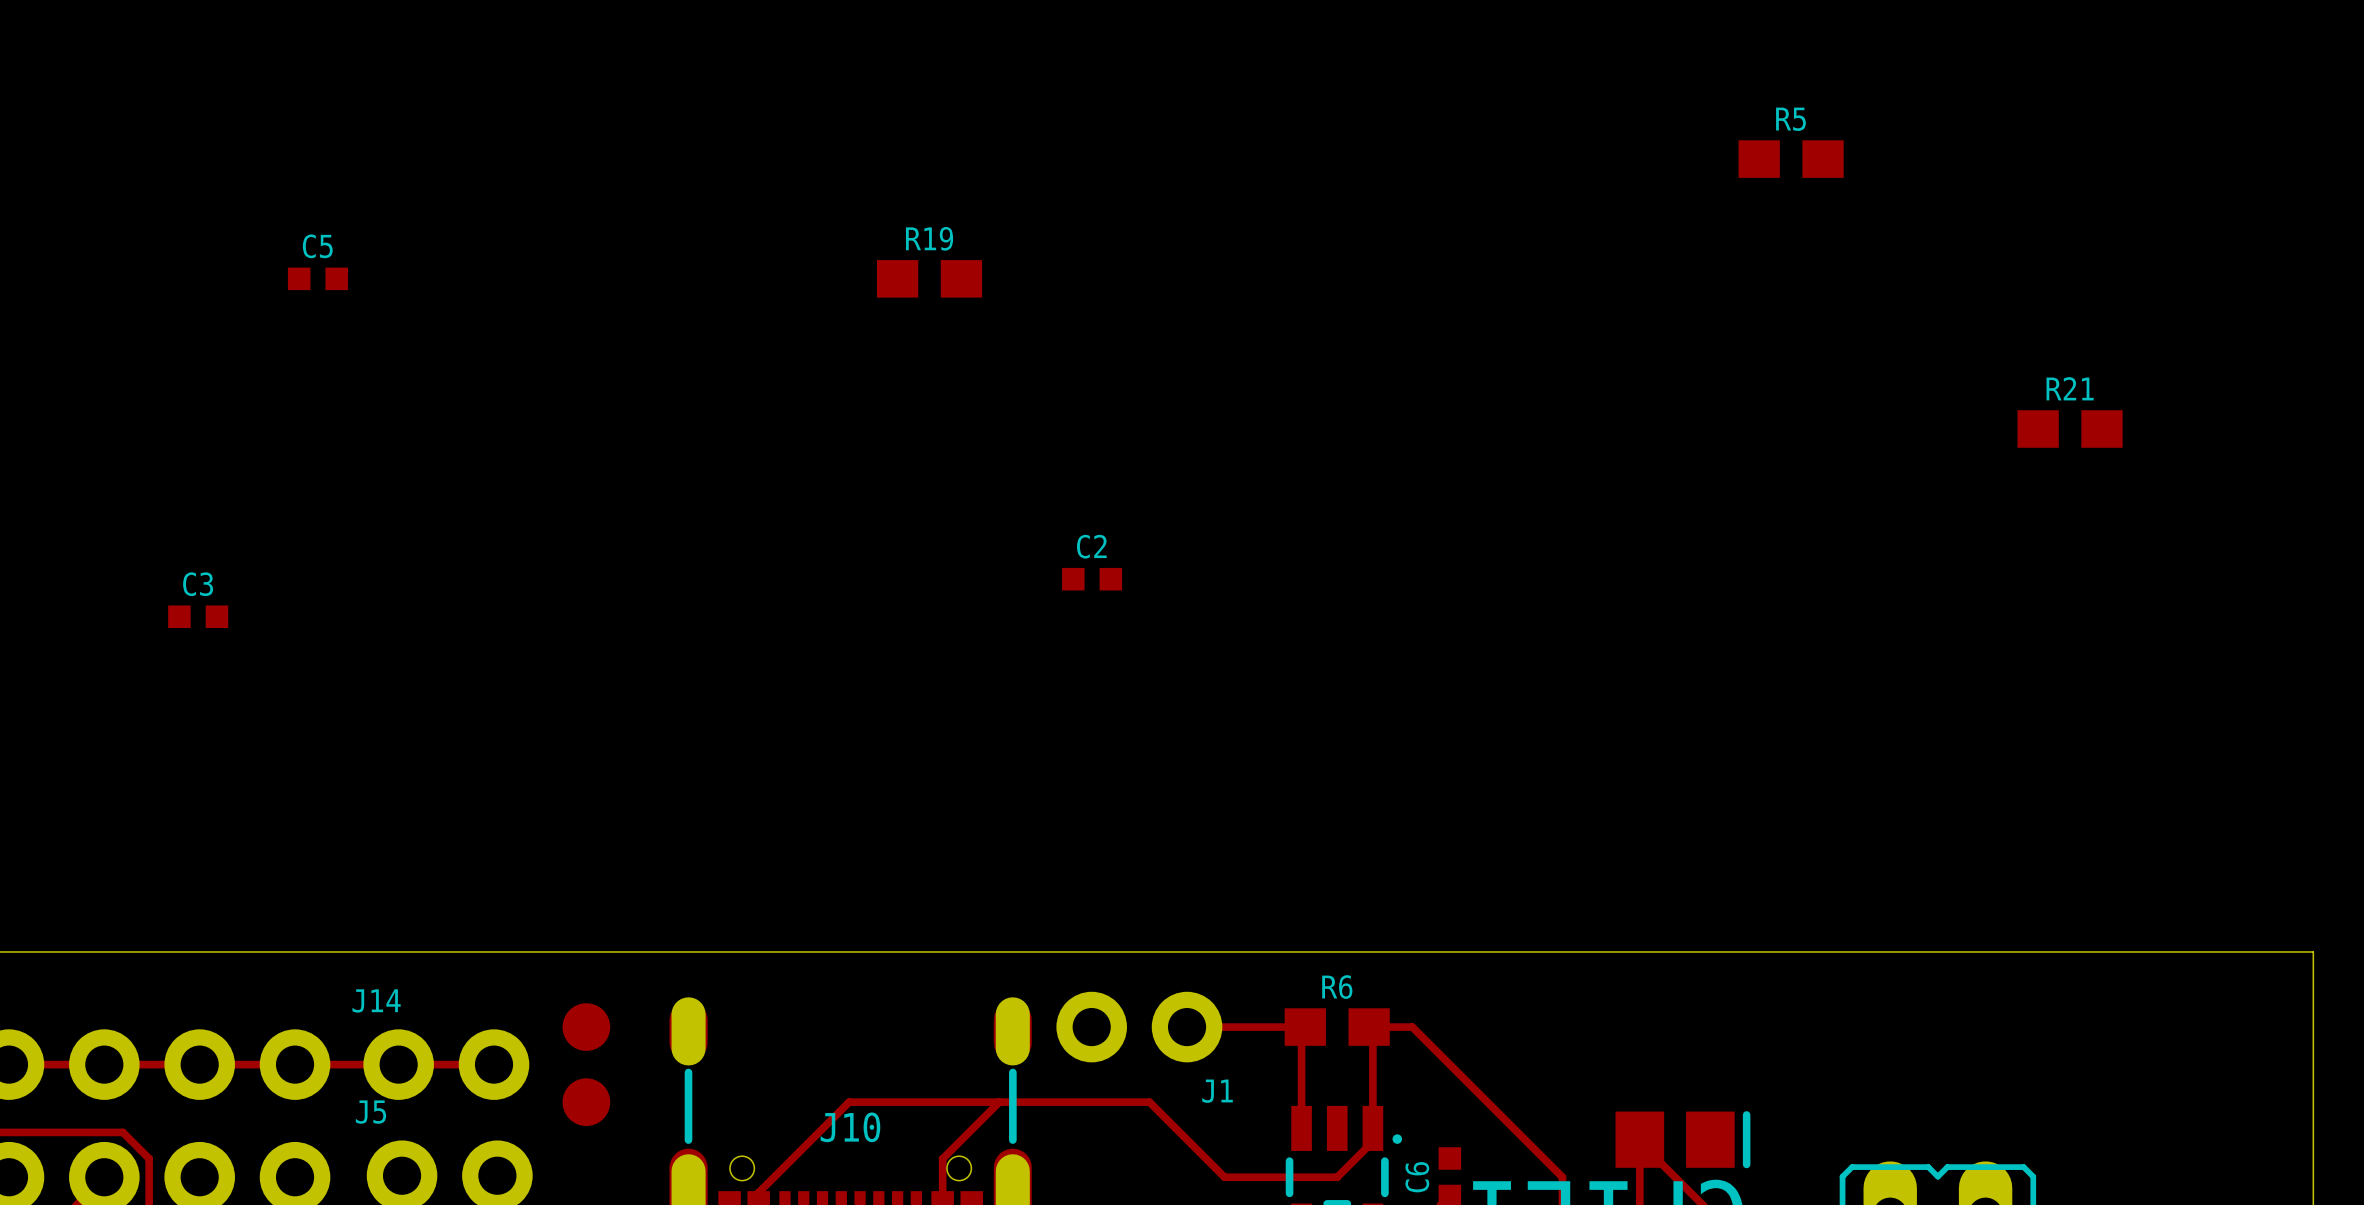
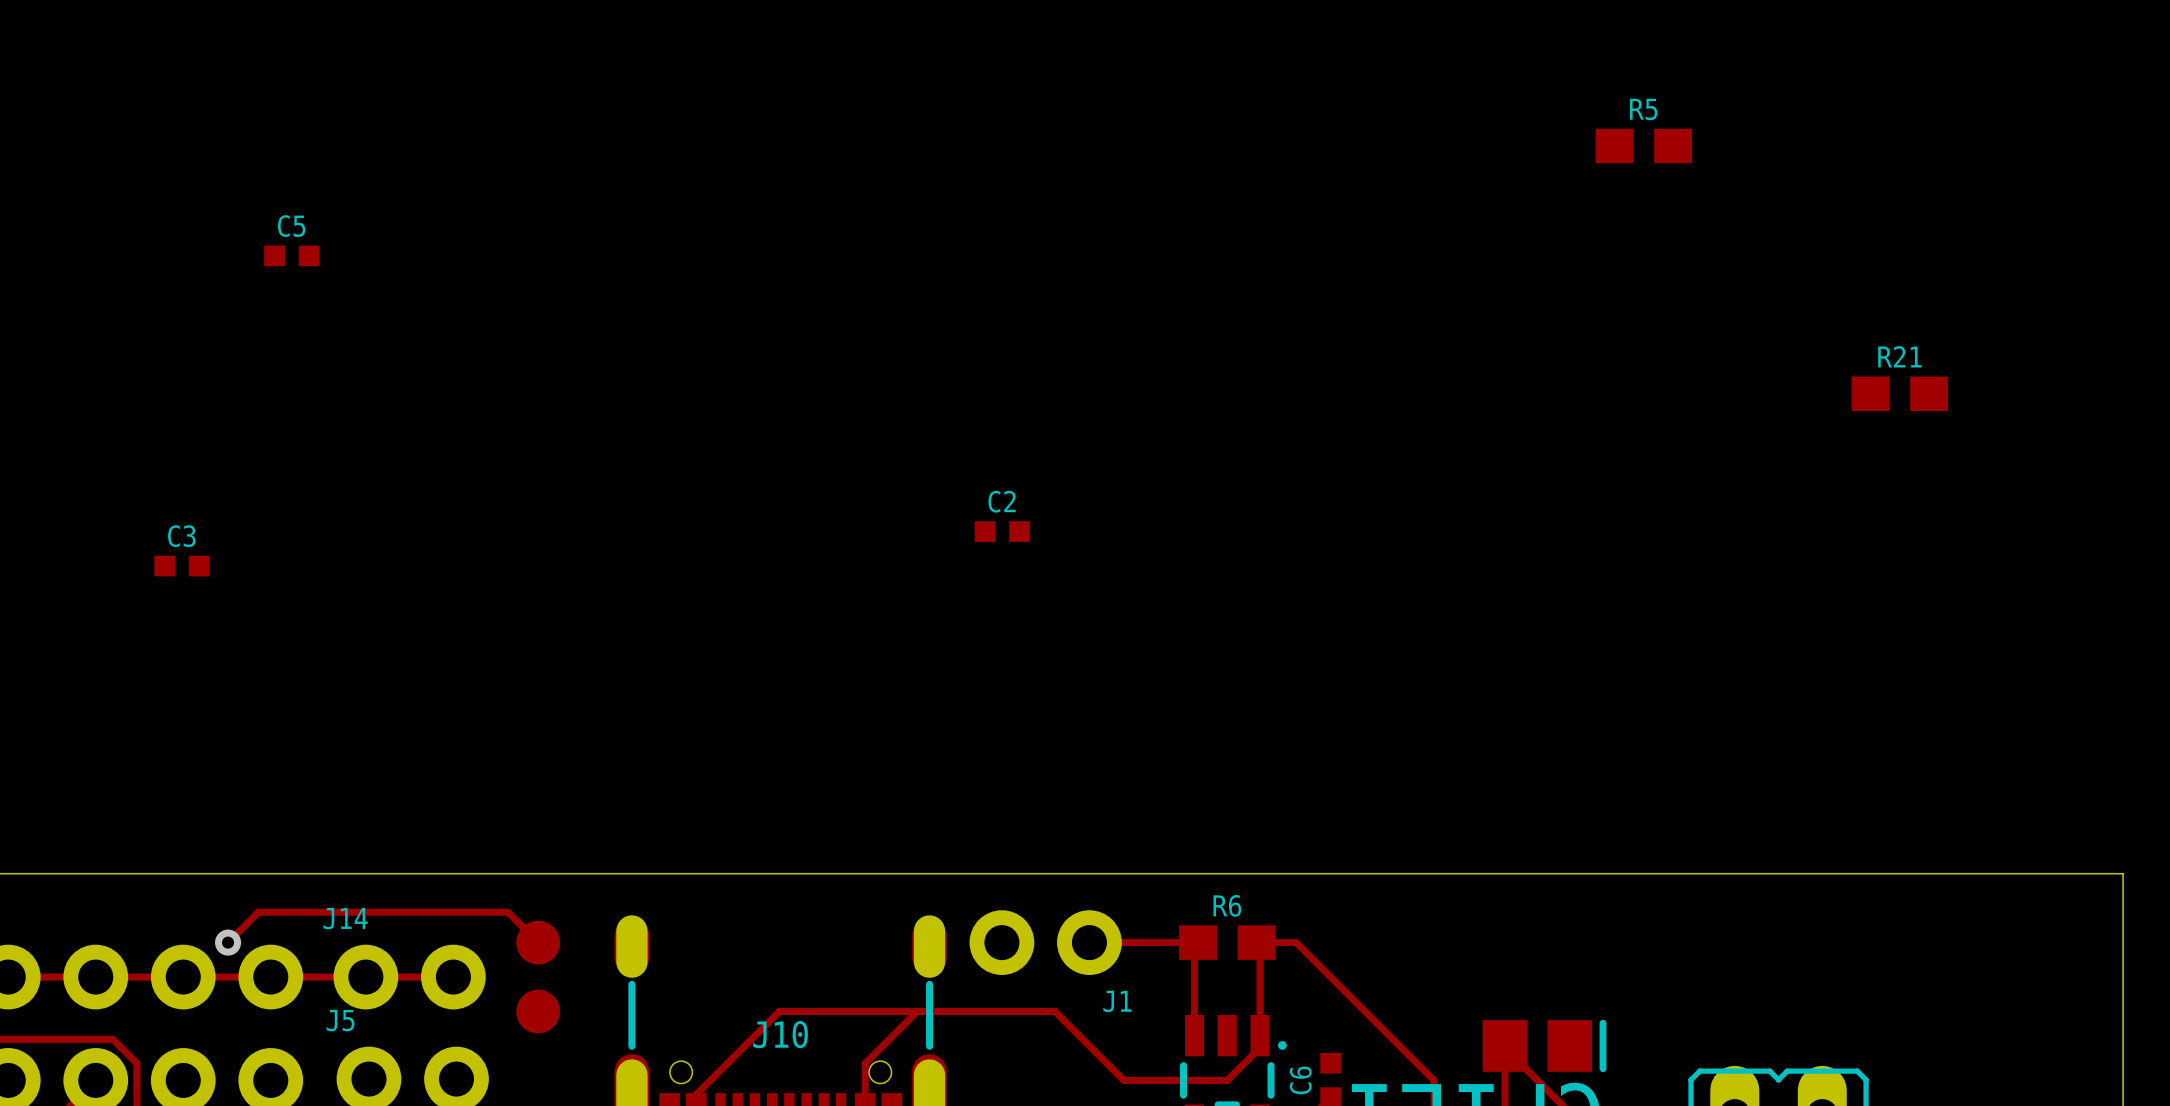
R19: (929, 278) -> none
track: none -> (228, 942) (258, 912) (507, 912) (538, 942)
via: none -> (228, 942)

